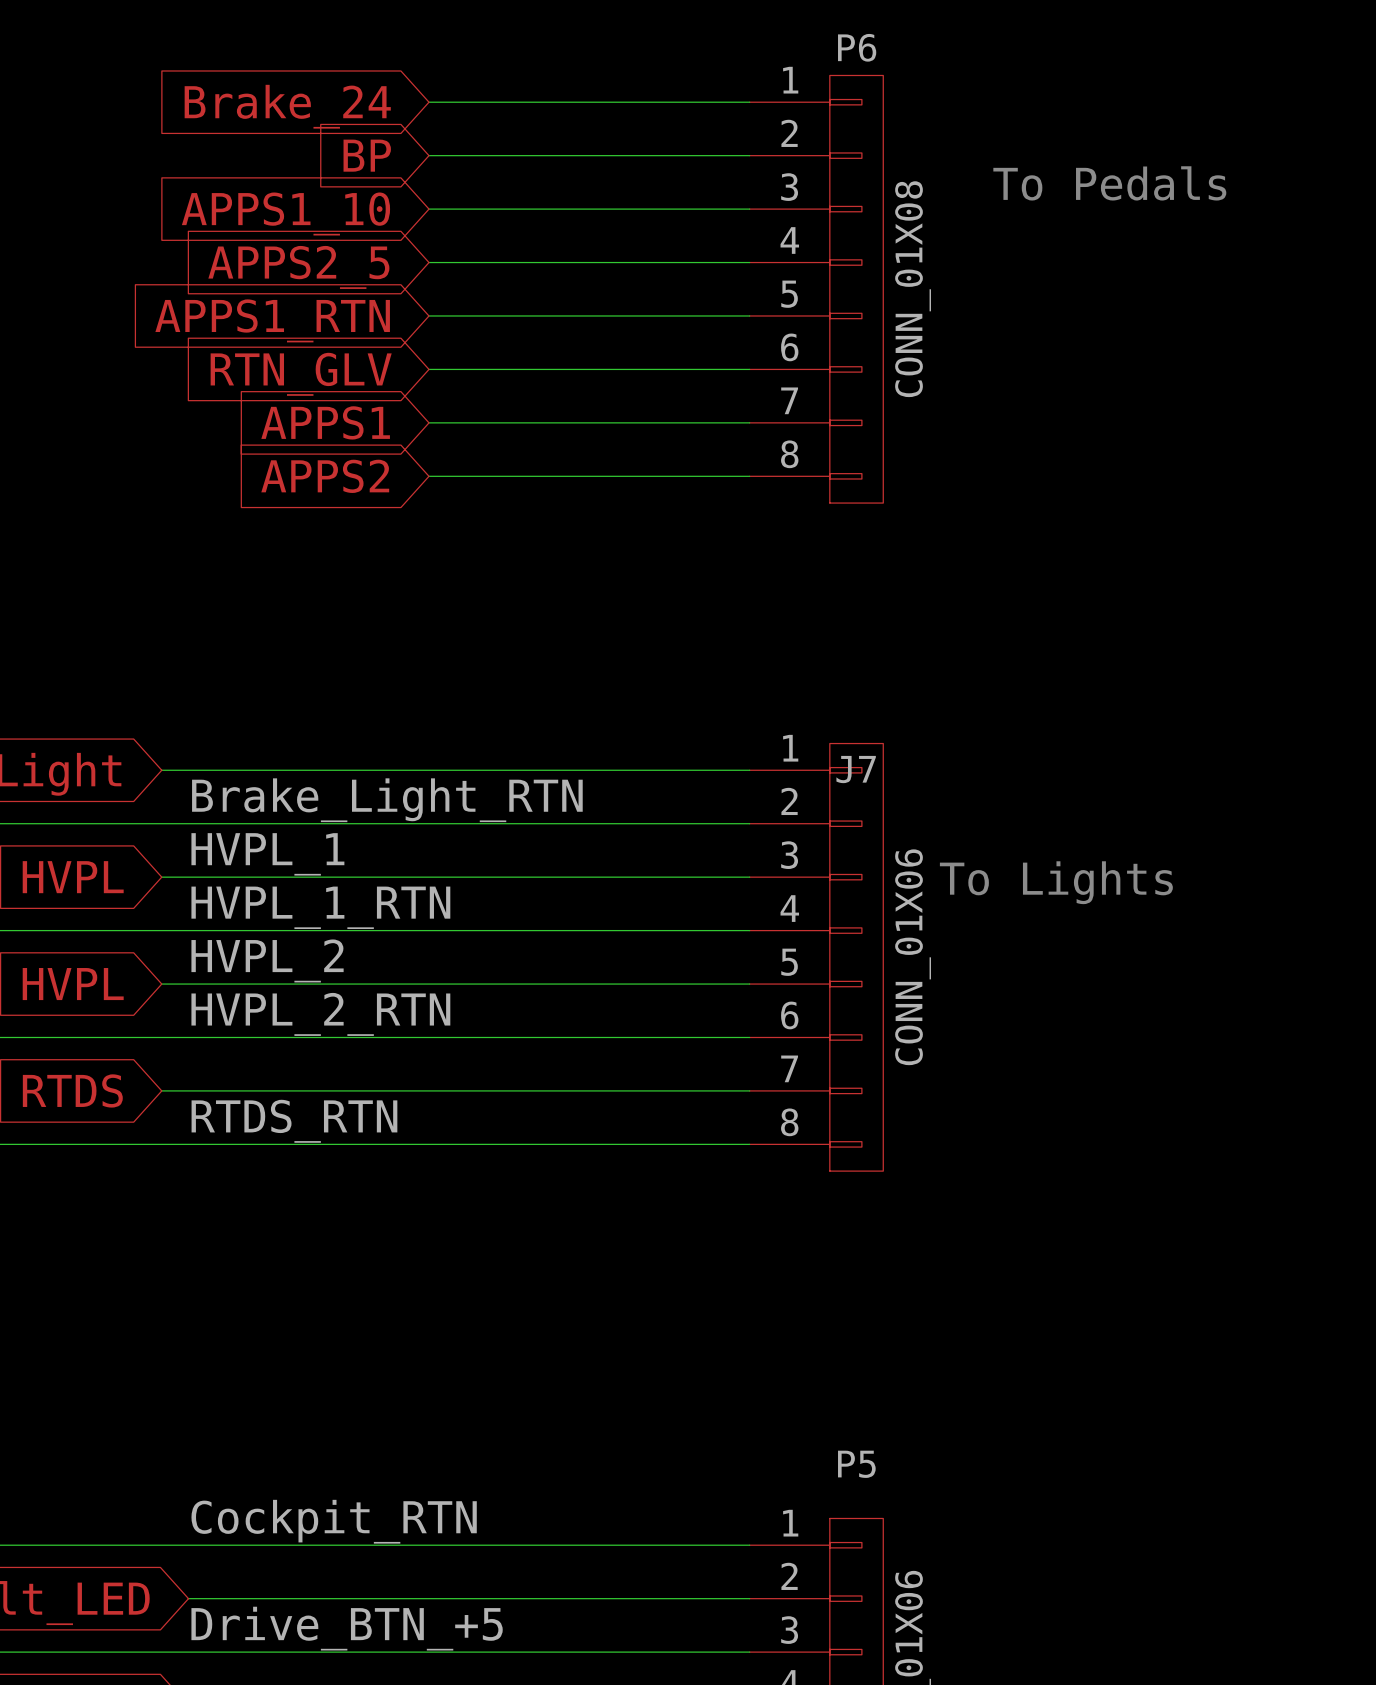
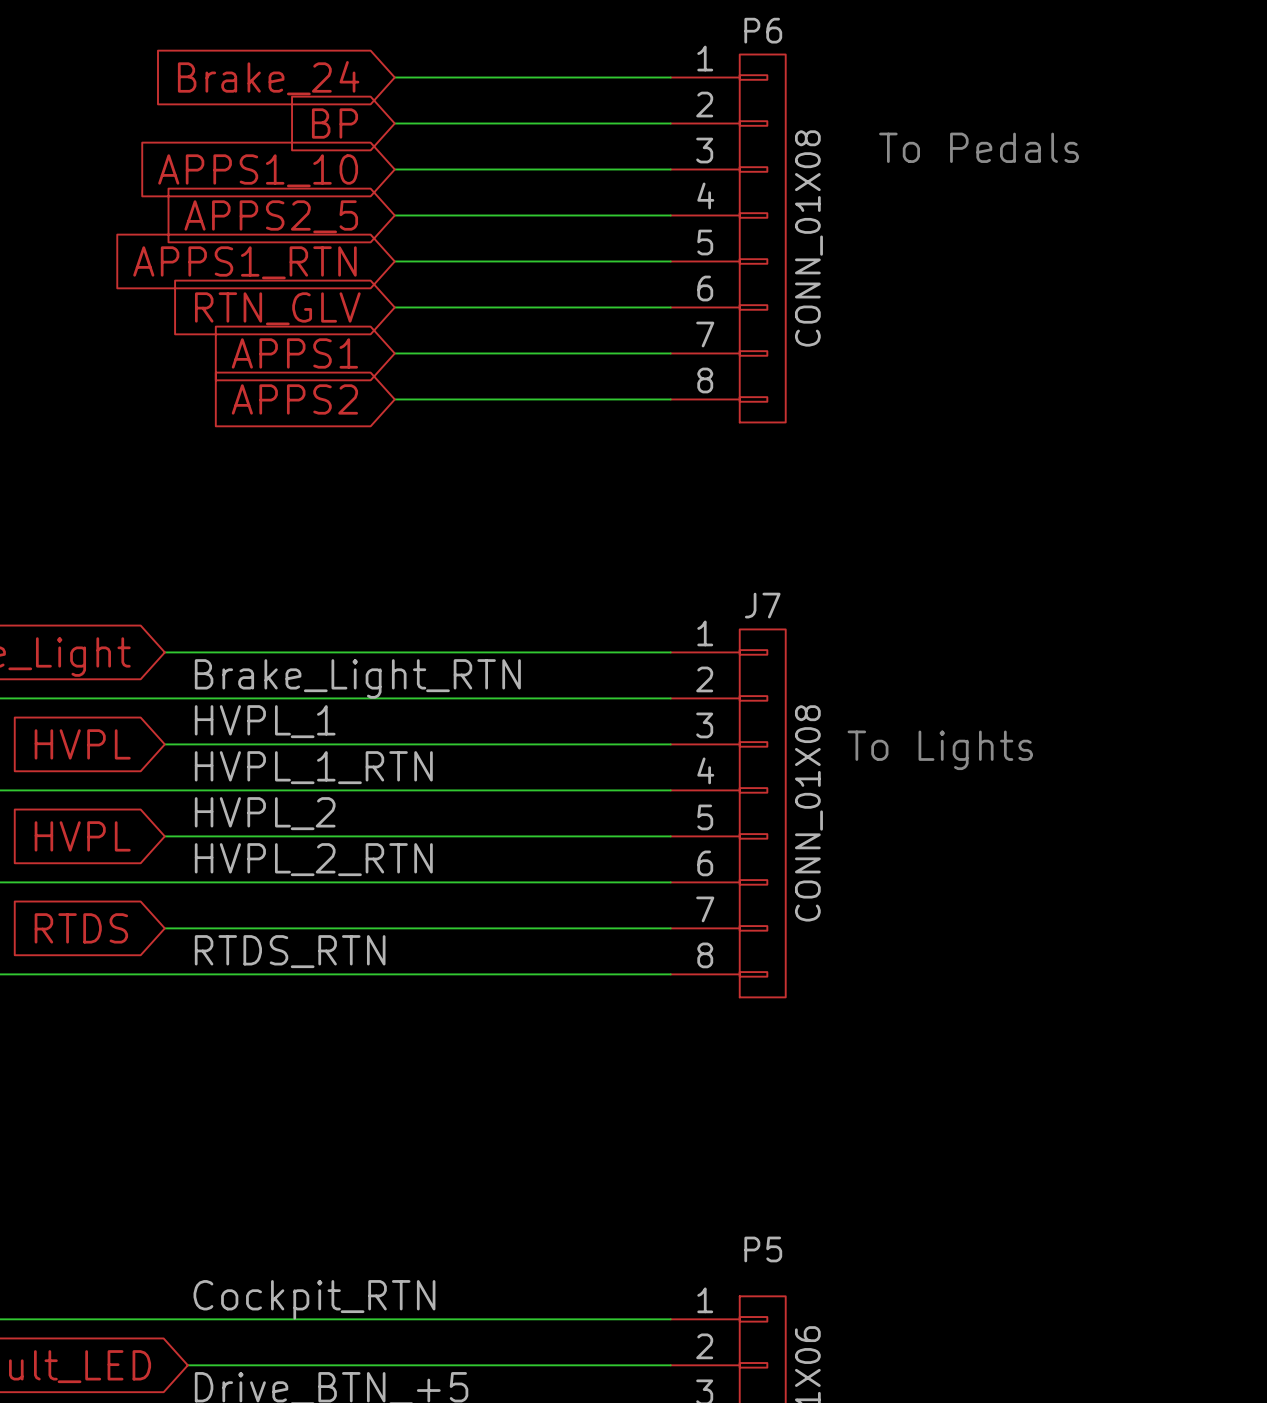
J7 name position: J7 (856, 769) -> J7 (762, 605)
J7 value: CONN_01X06 (913, 957) -> CONN_01X08 (808, 813)

